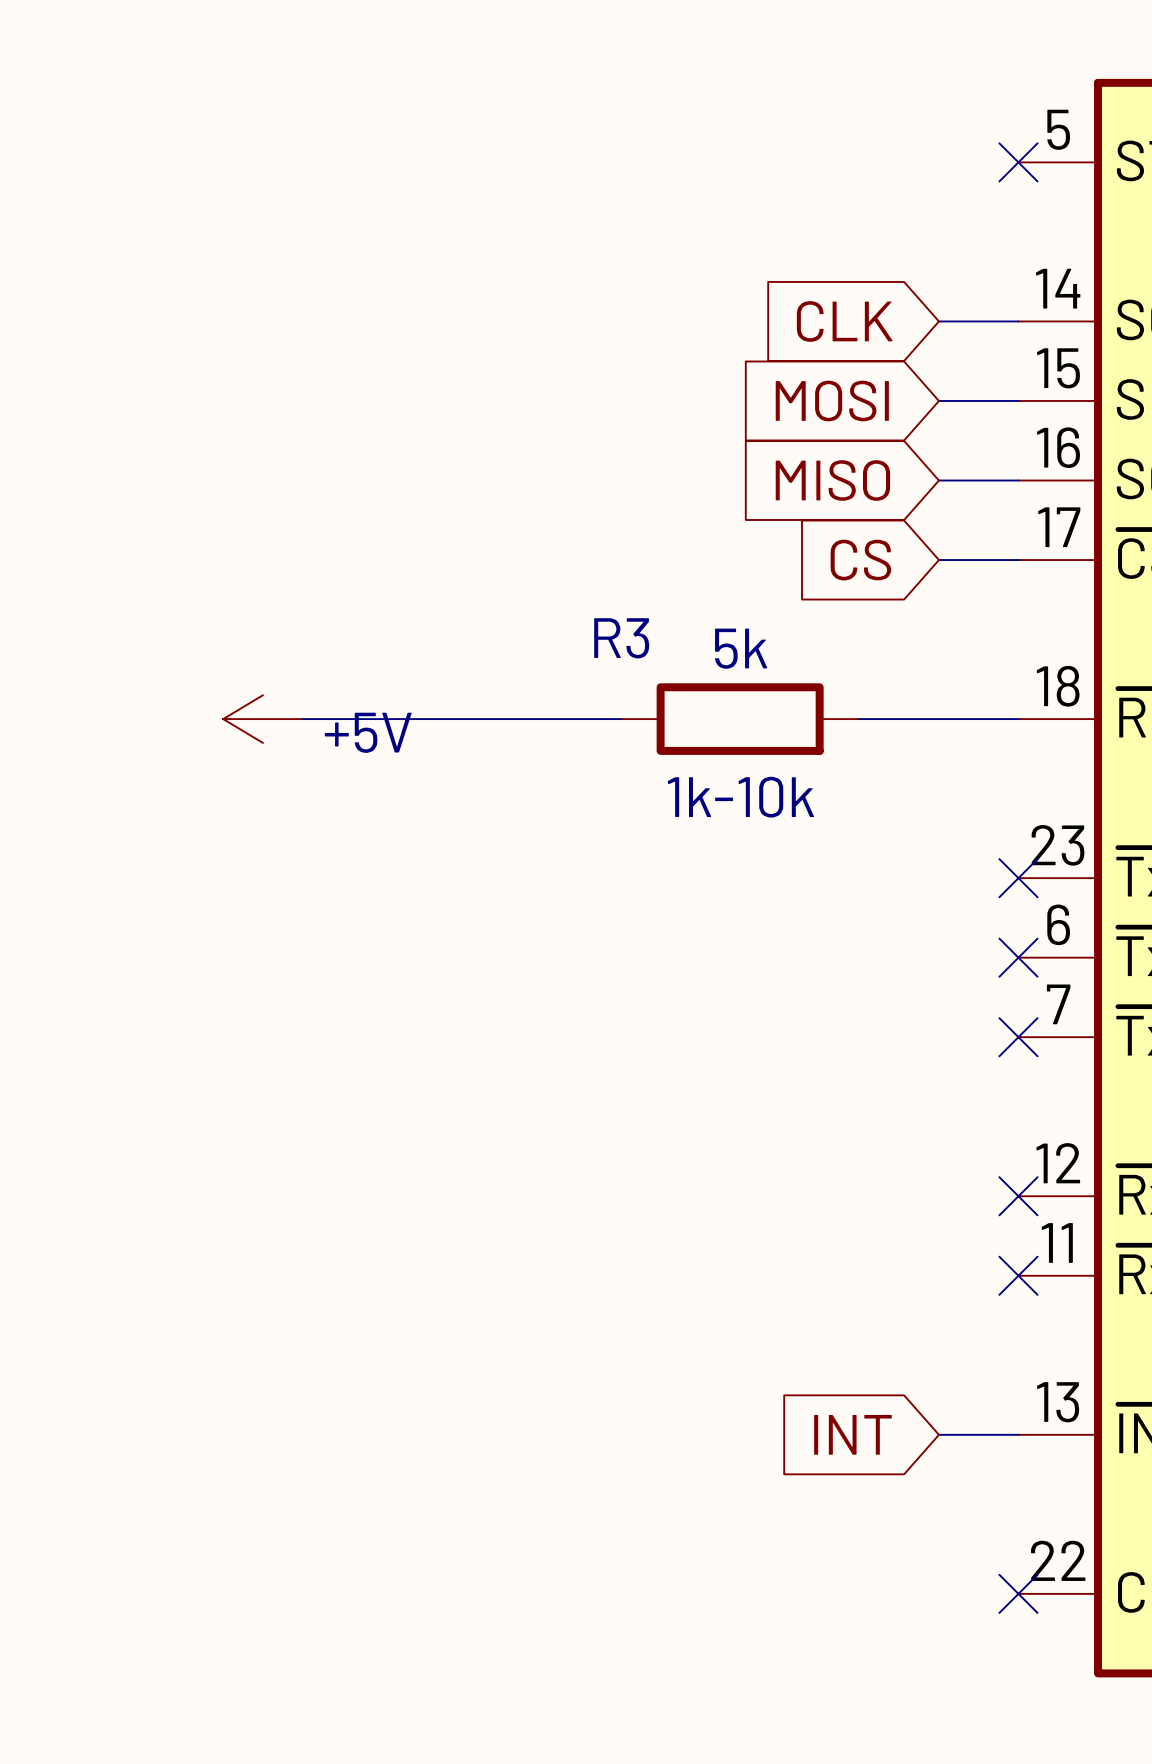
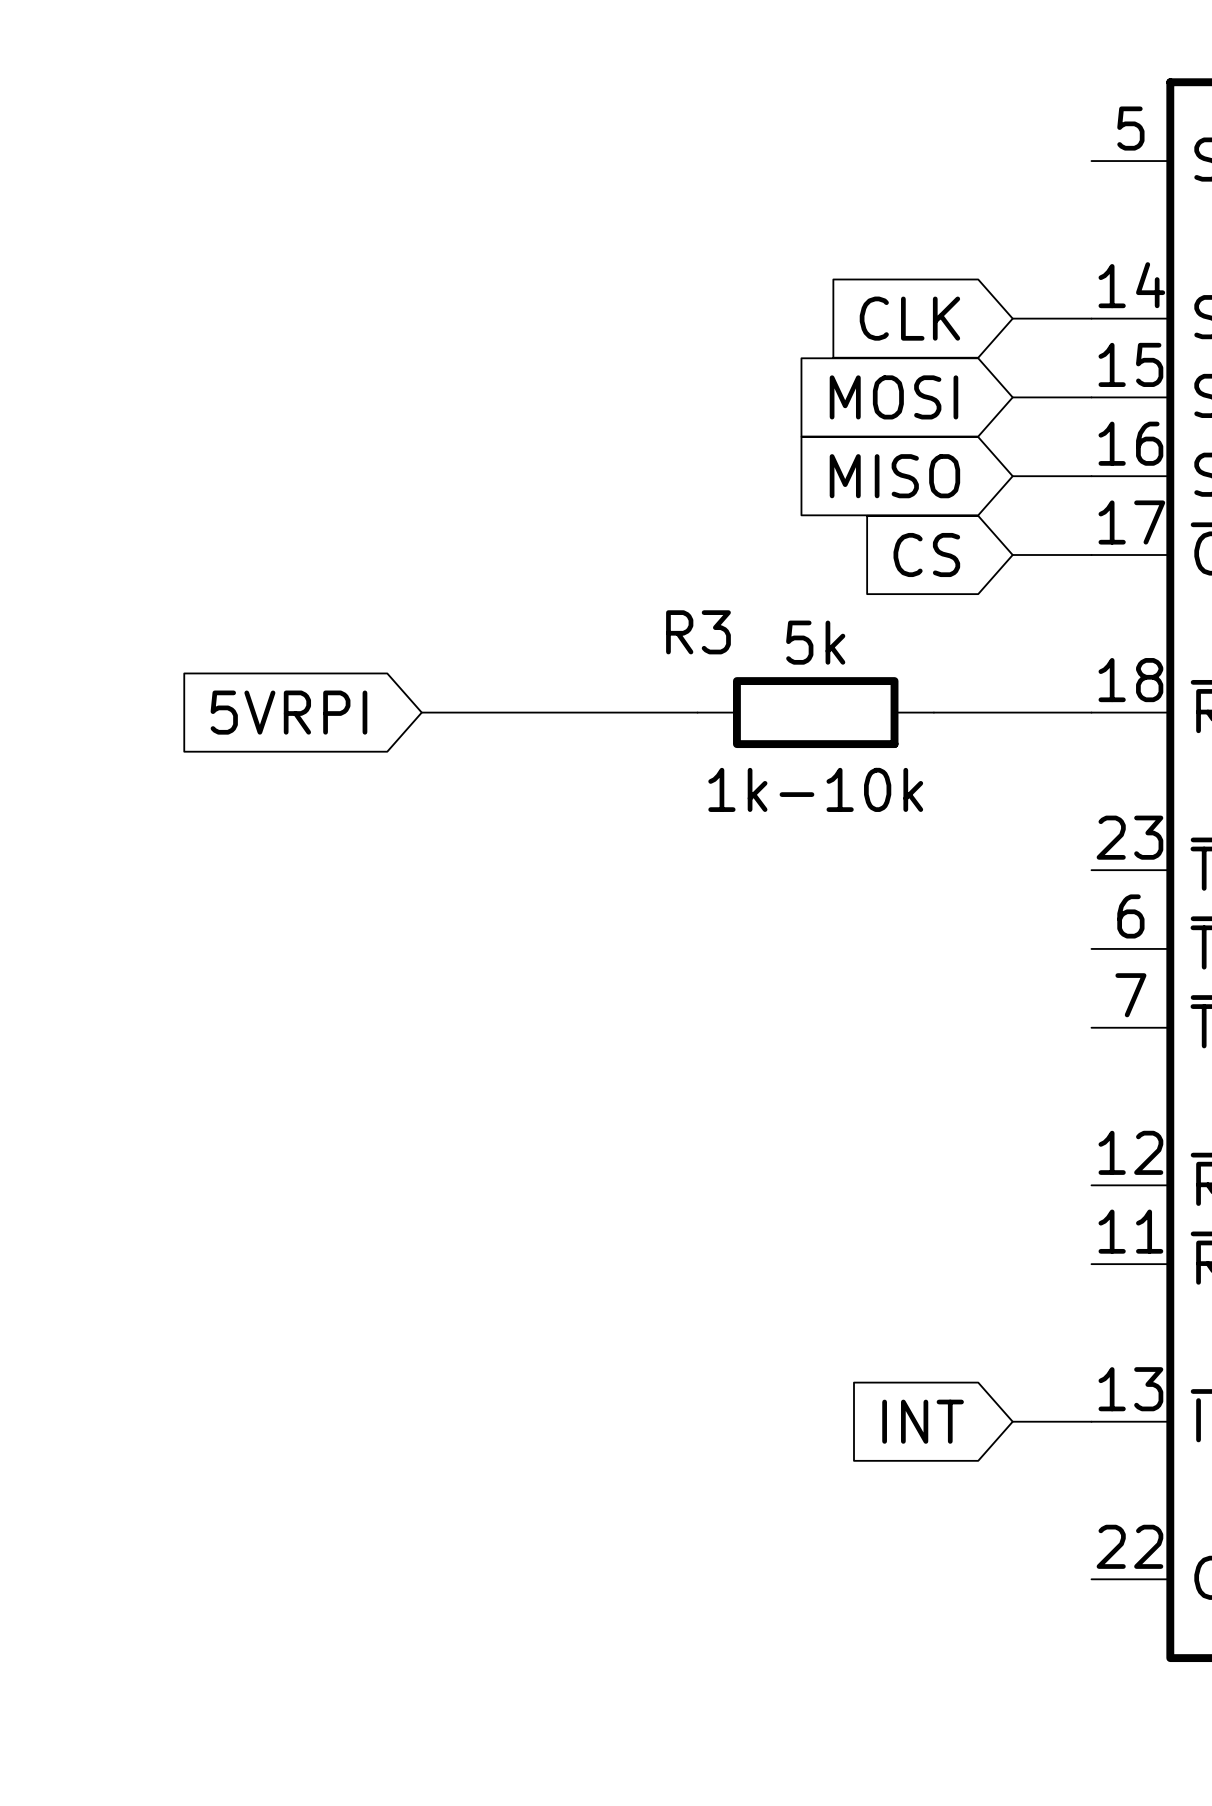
no-connect mark: (1018, 162) -> none
global label: none -> 5VRPI (288, 712)
power symbol: +5V (262, 719) -> none
wire: (302, 719) (342, 719) -> none
no-connect mark: (1018, 878) -> none
no-connect mark: (1018, 957) -> none
no-connect mark: (1018, 1037) -> none
no-connect mark: (1018, 1196) -> none
no-connect mark: (1018, 1275) -> none
no-connect mark: (1018, 1593) -> none

